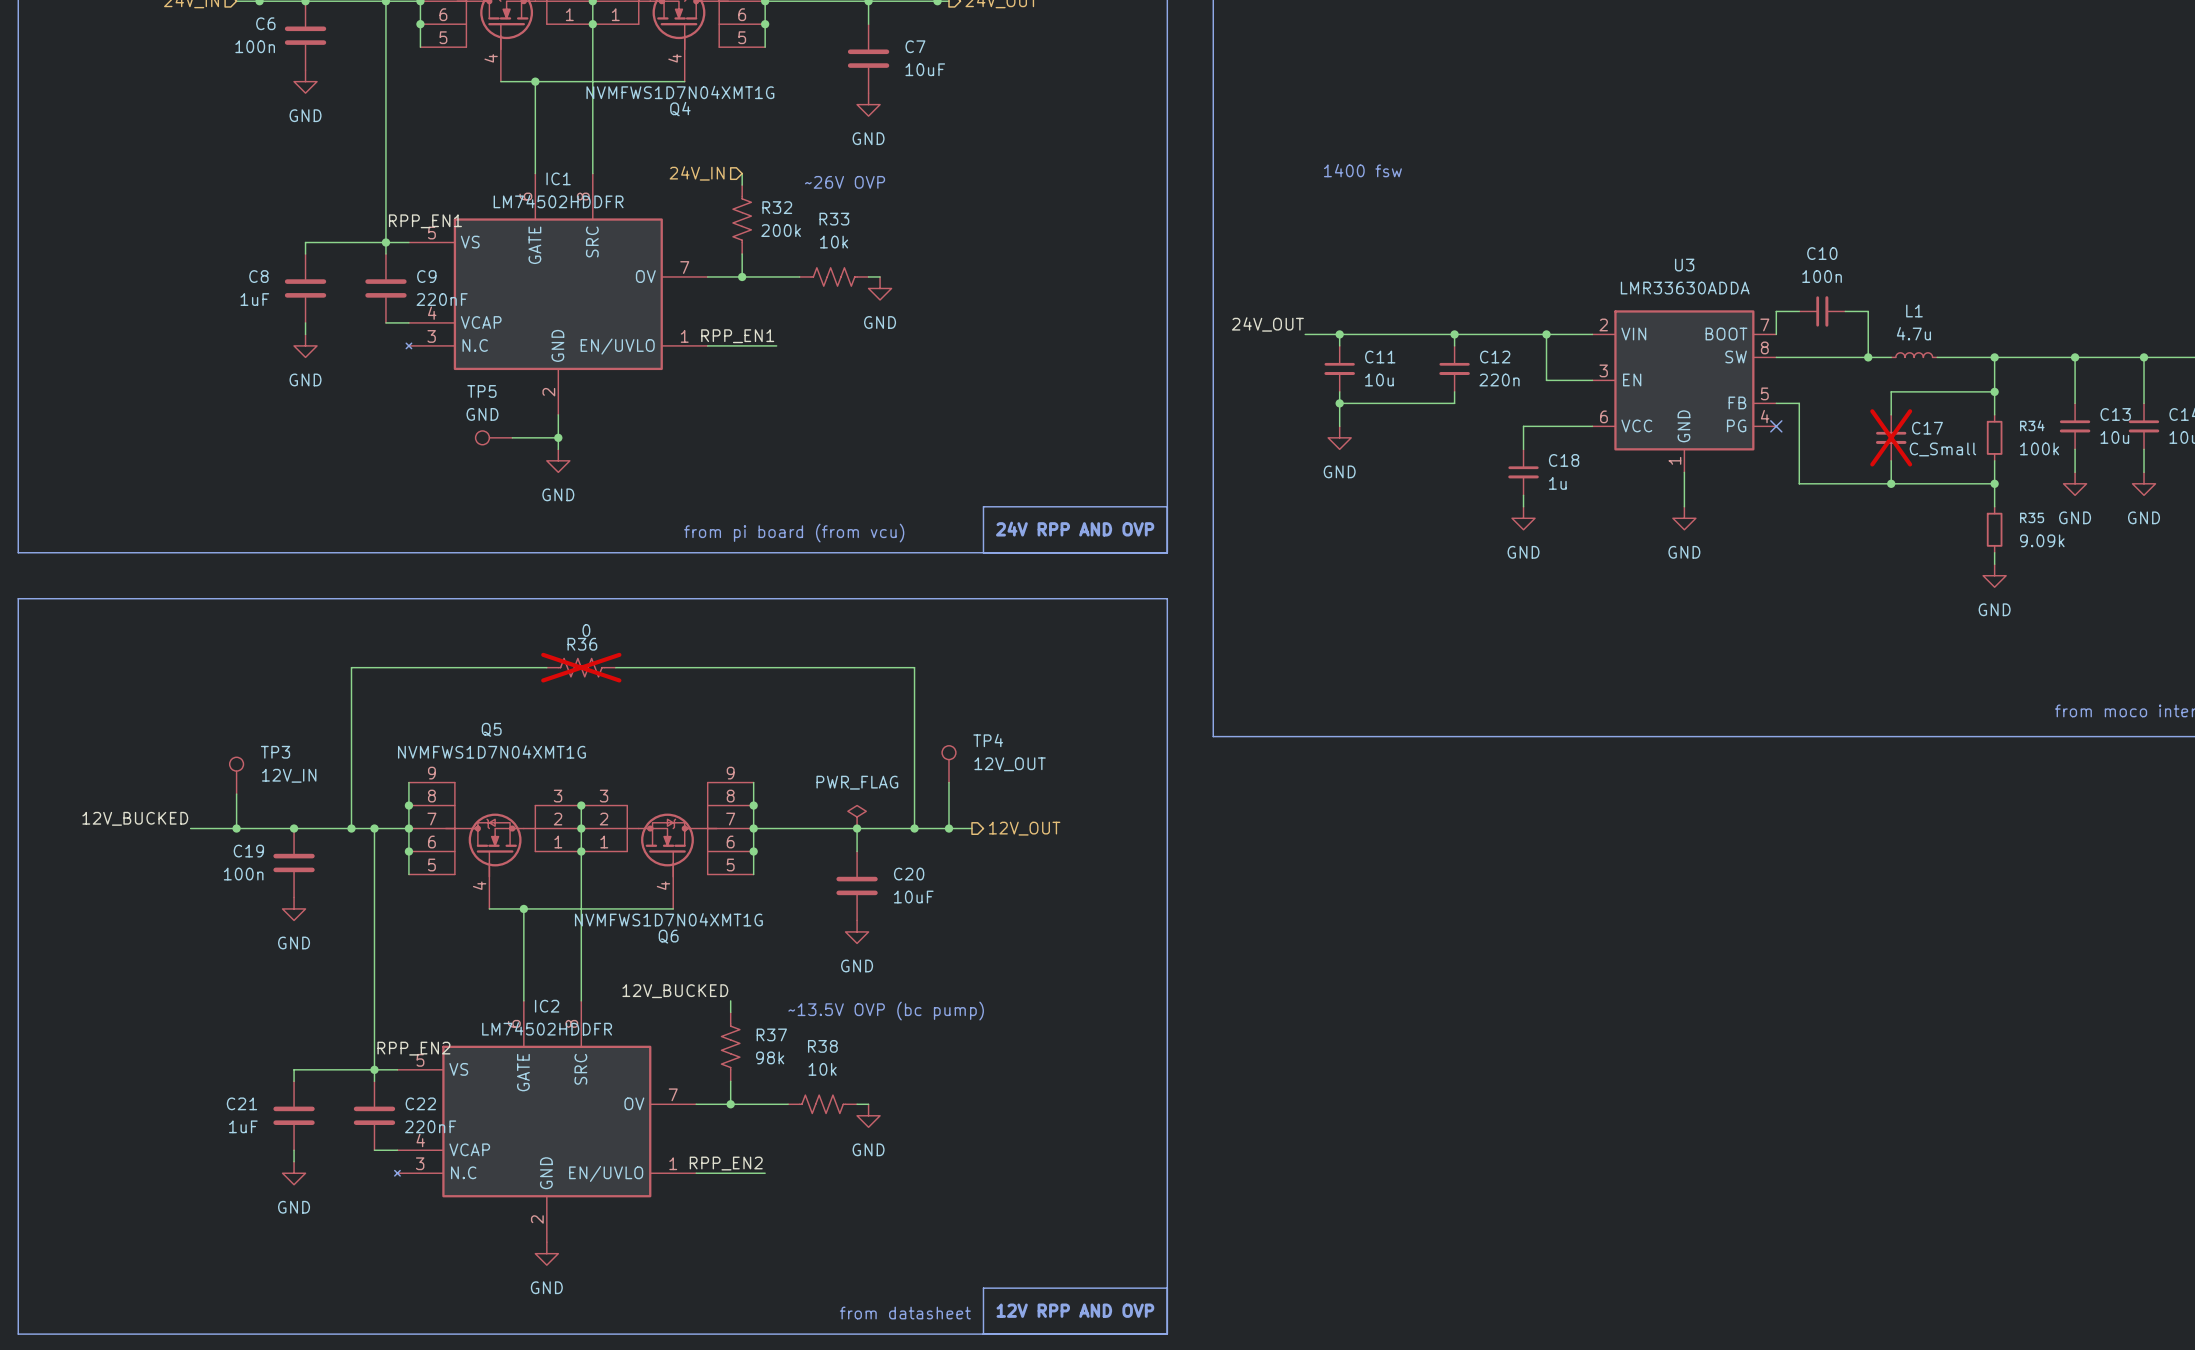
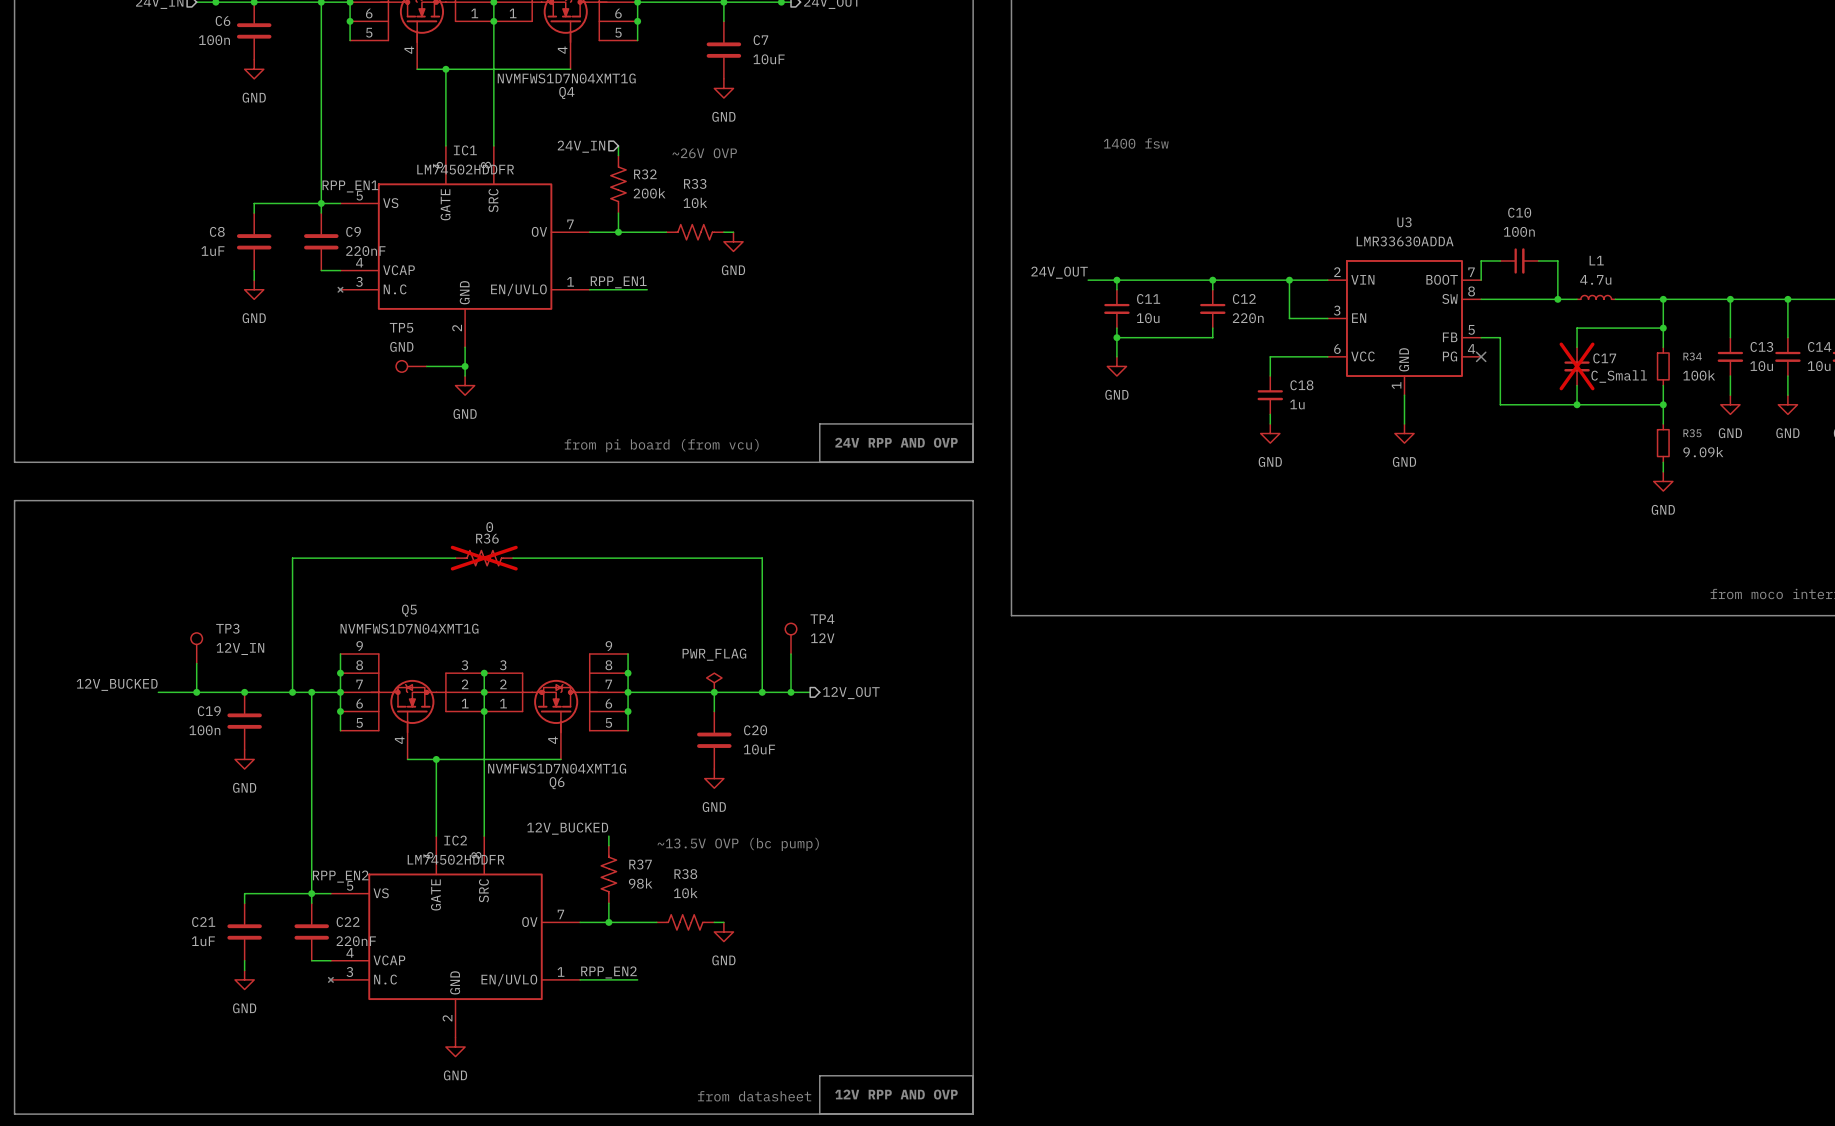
TP4 value: 12V_OUT (1010, 764) -> 12V (822, 638)

